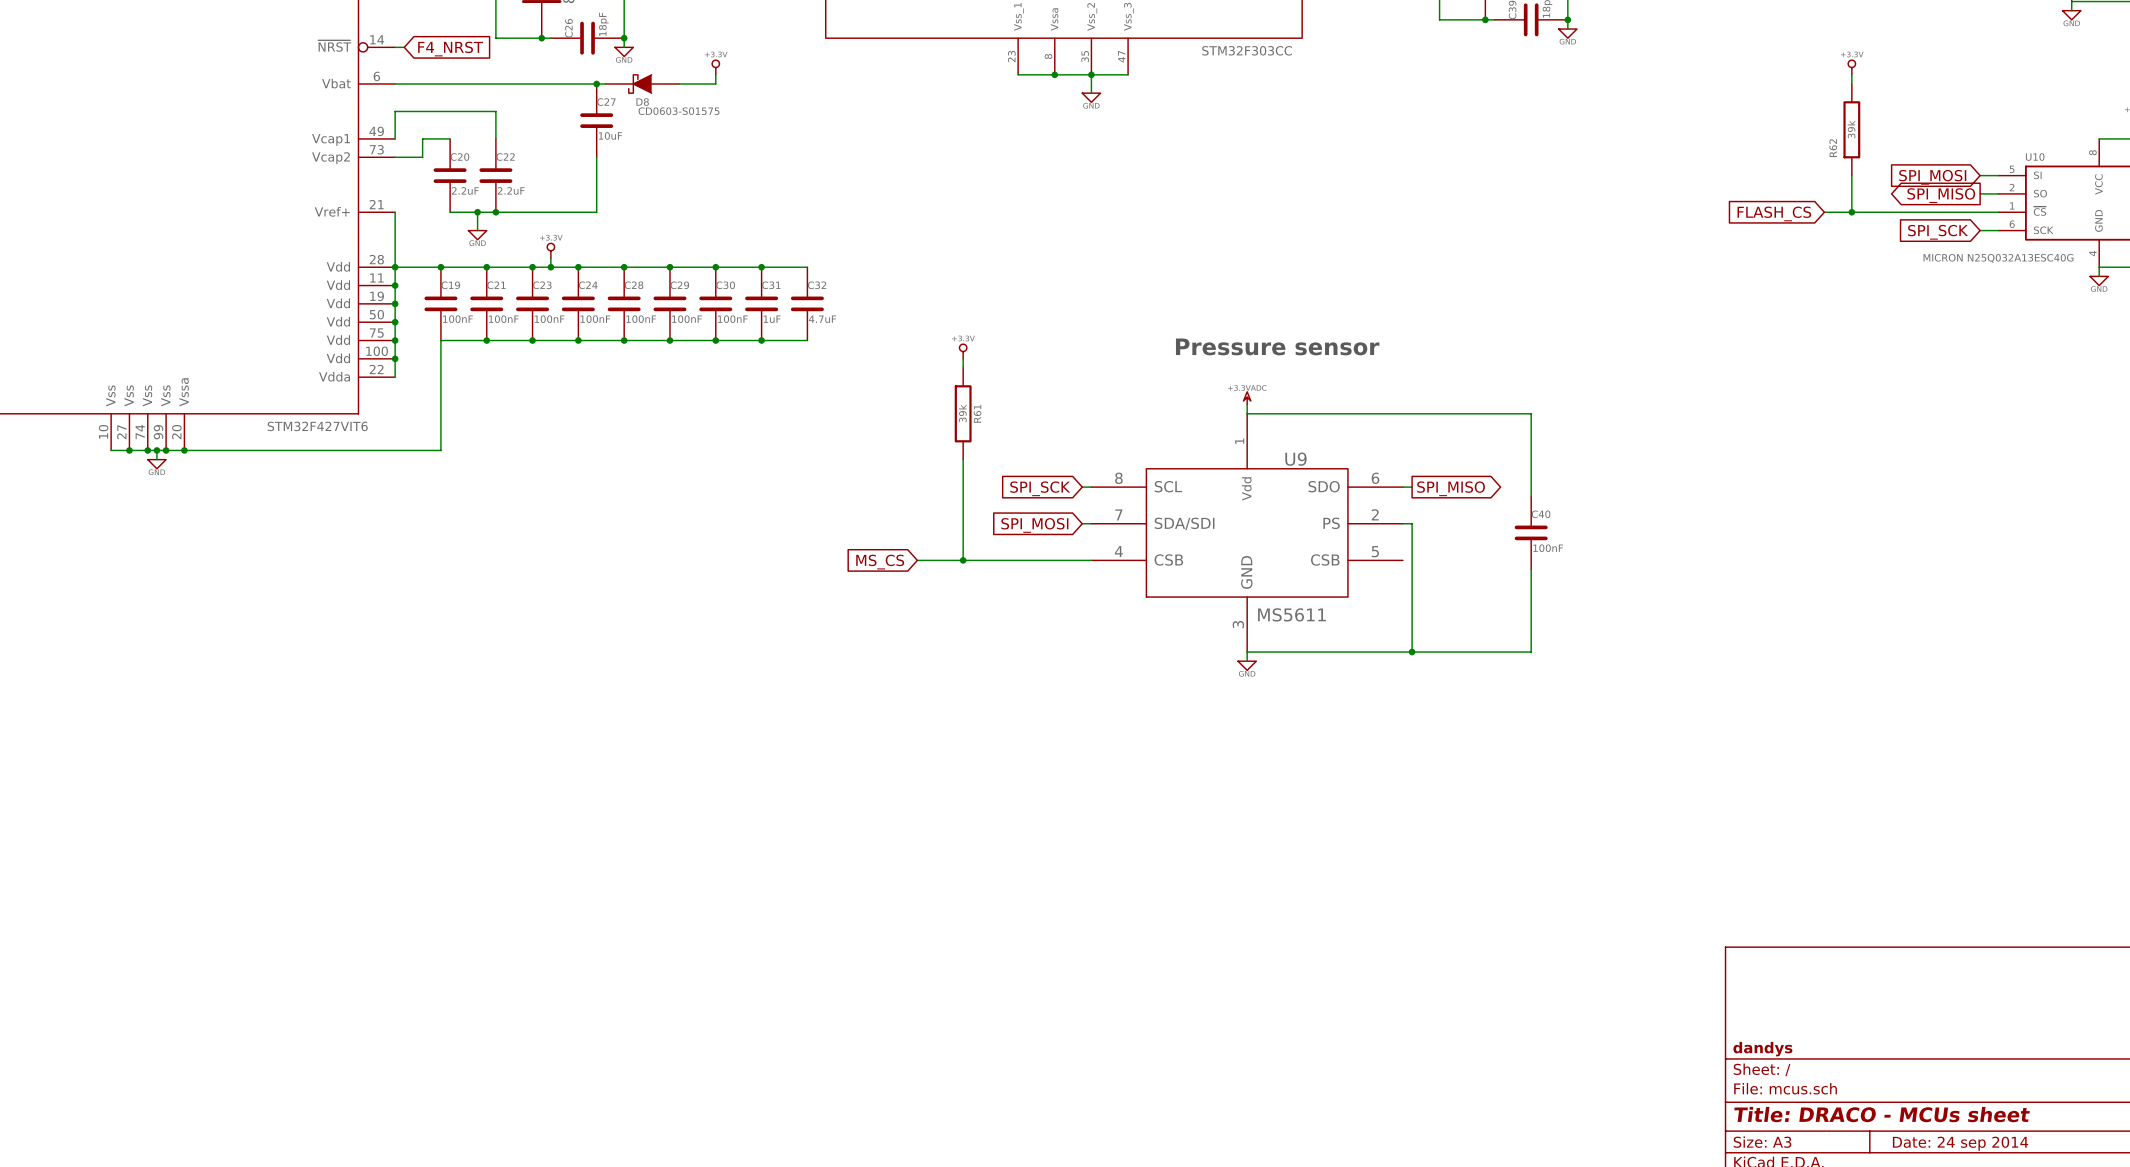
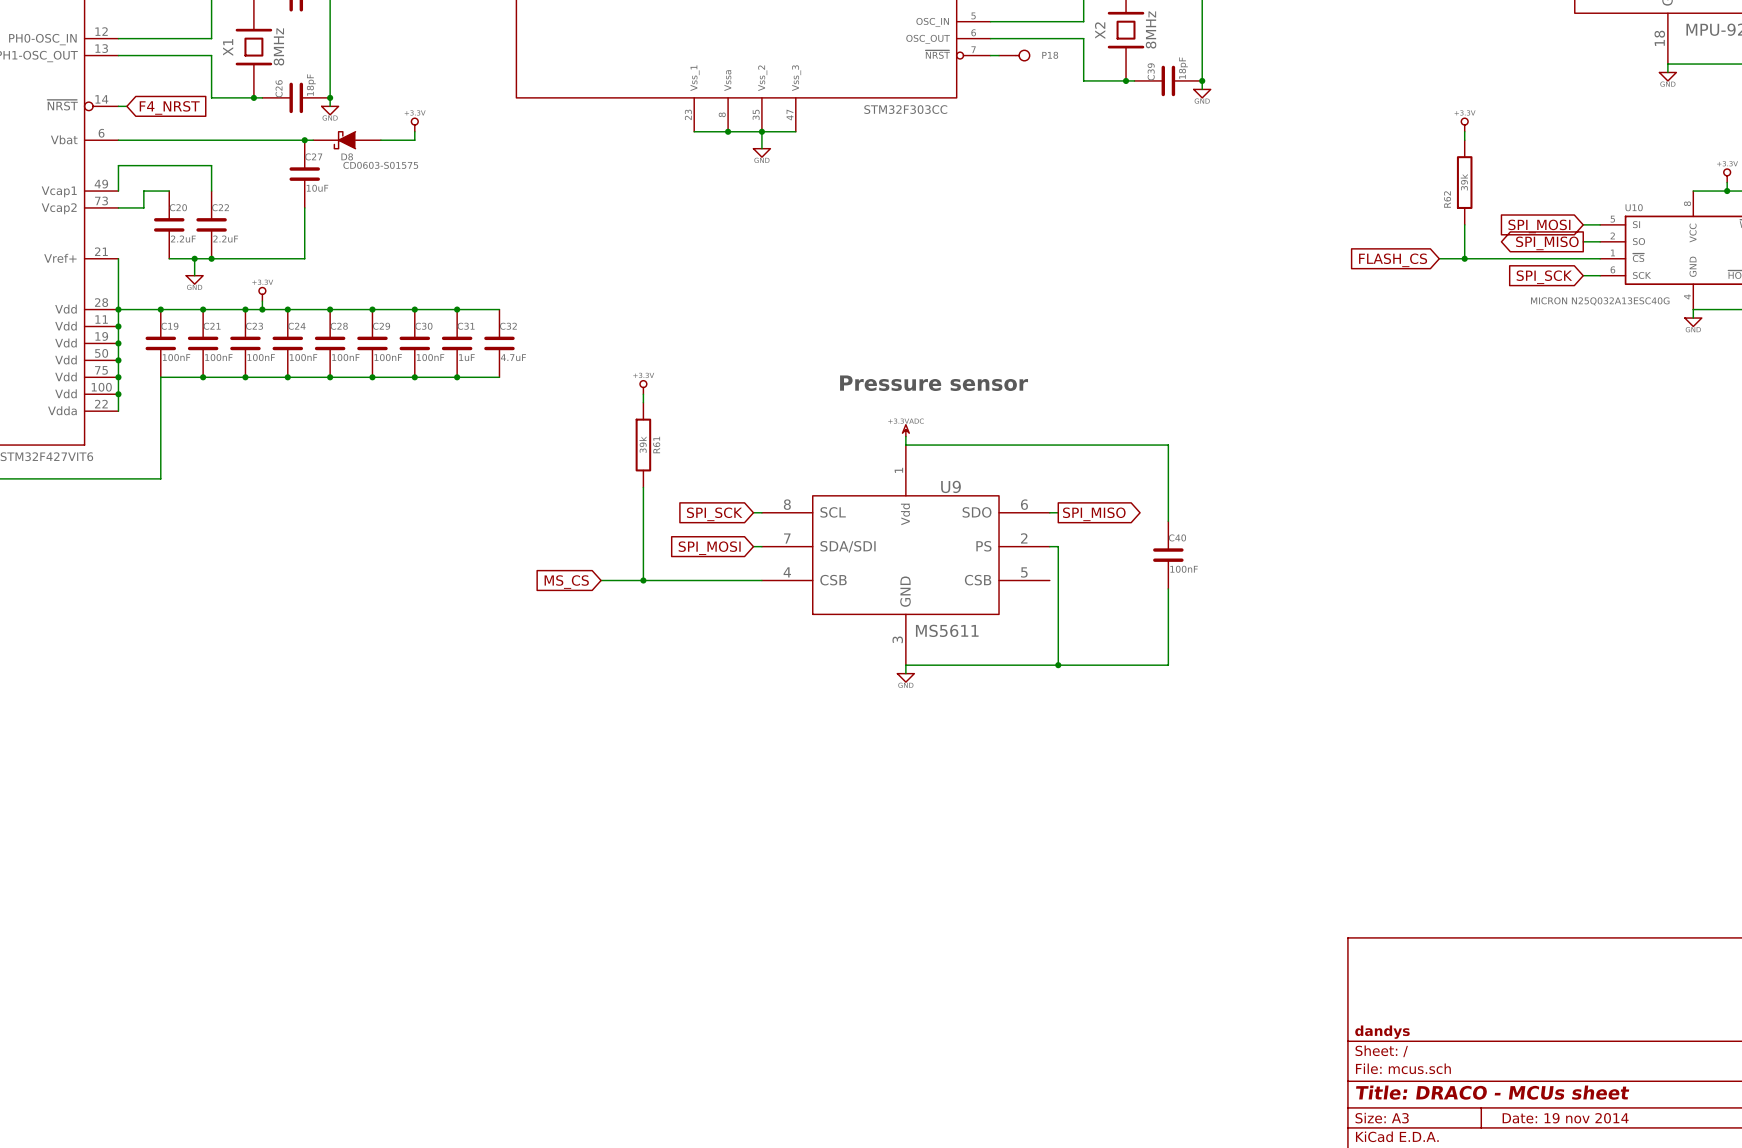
title block: Date: 24 sep 2014 (1960, 1143) -> Date: 19 nov 2014 (1565, 1118)

